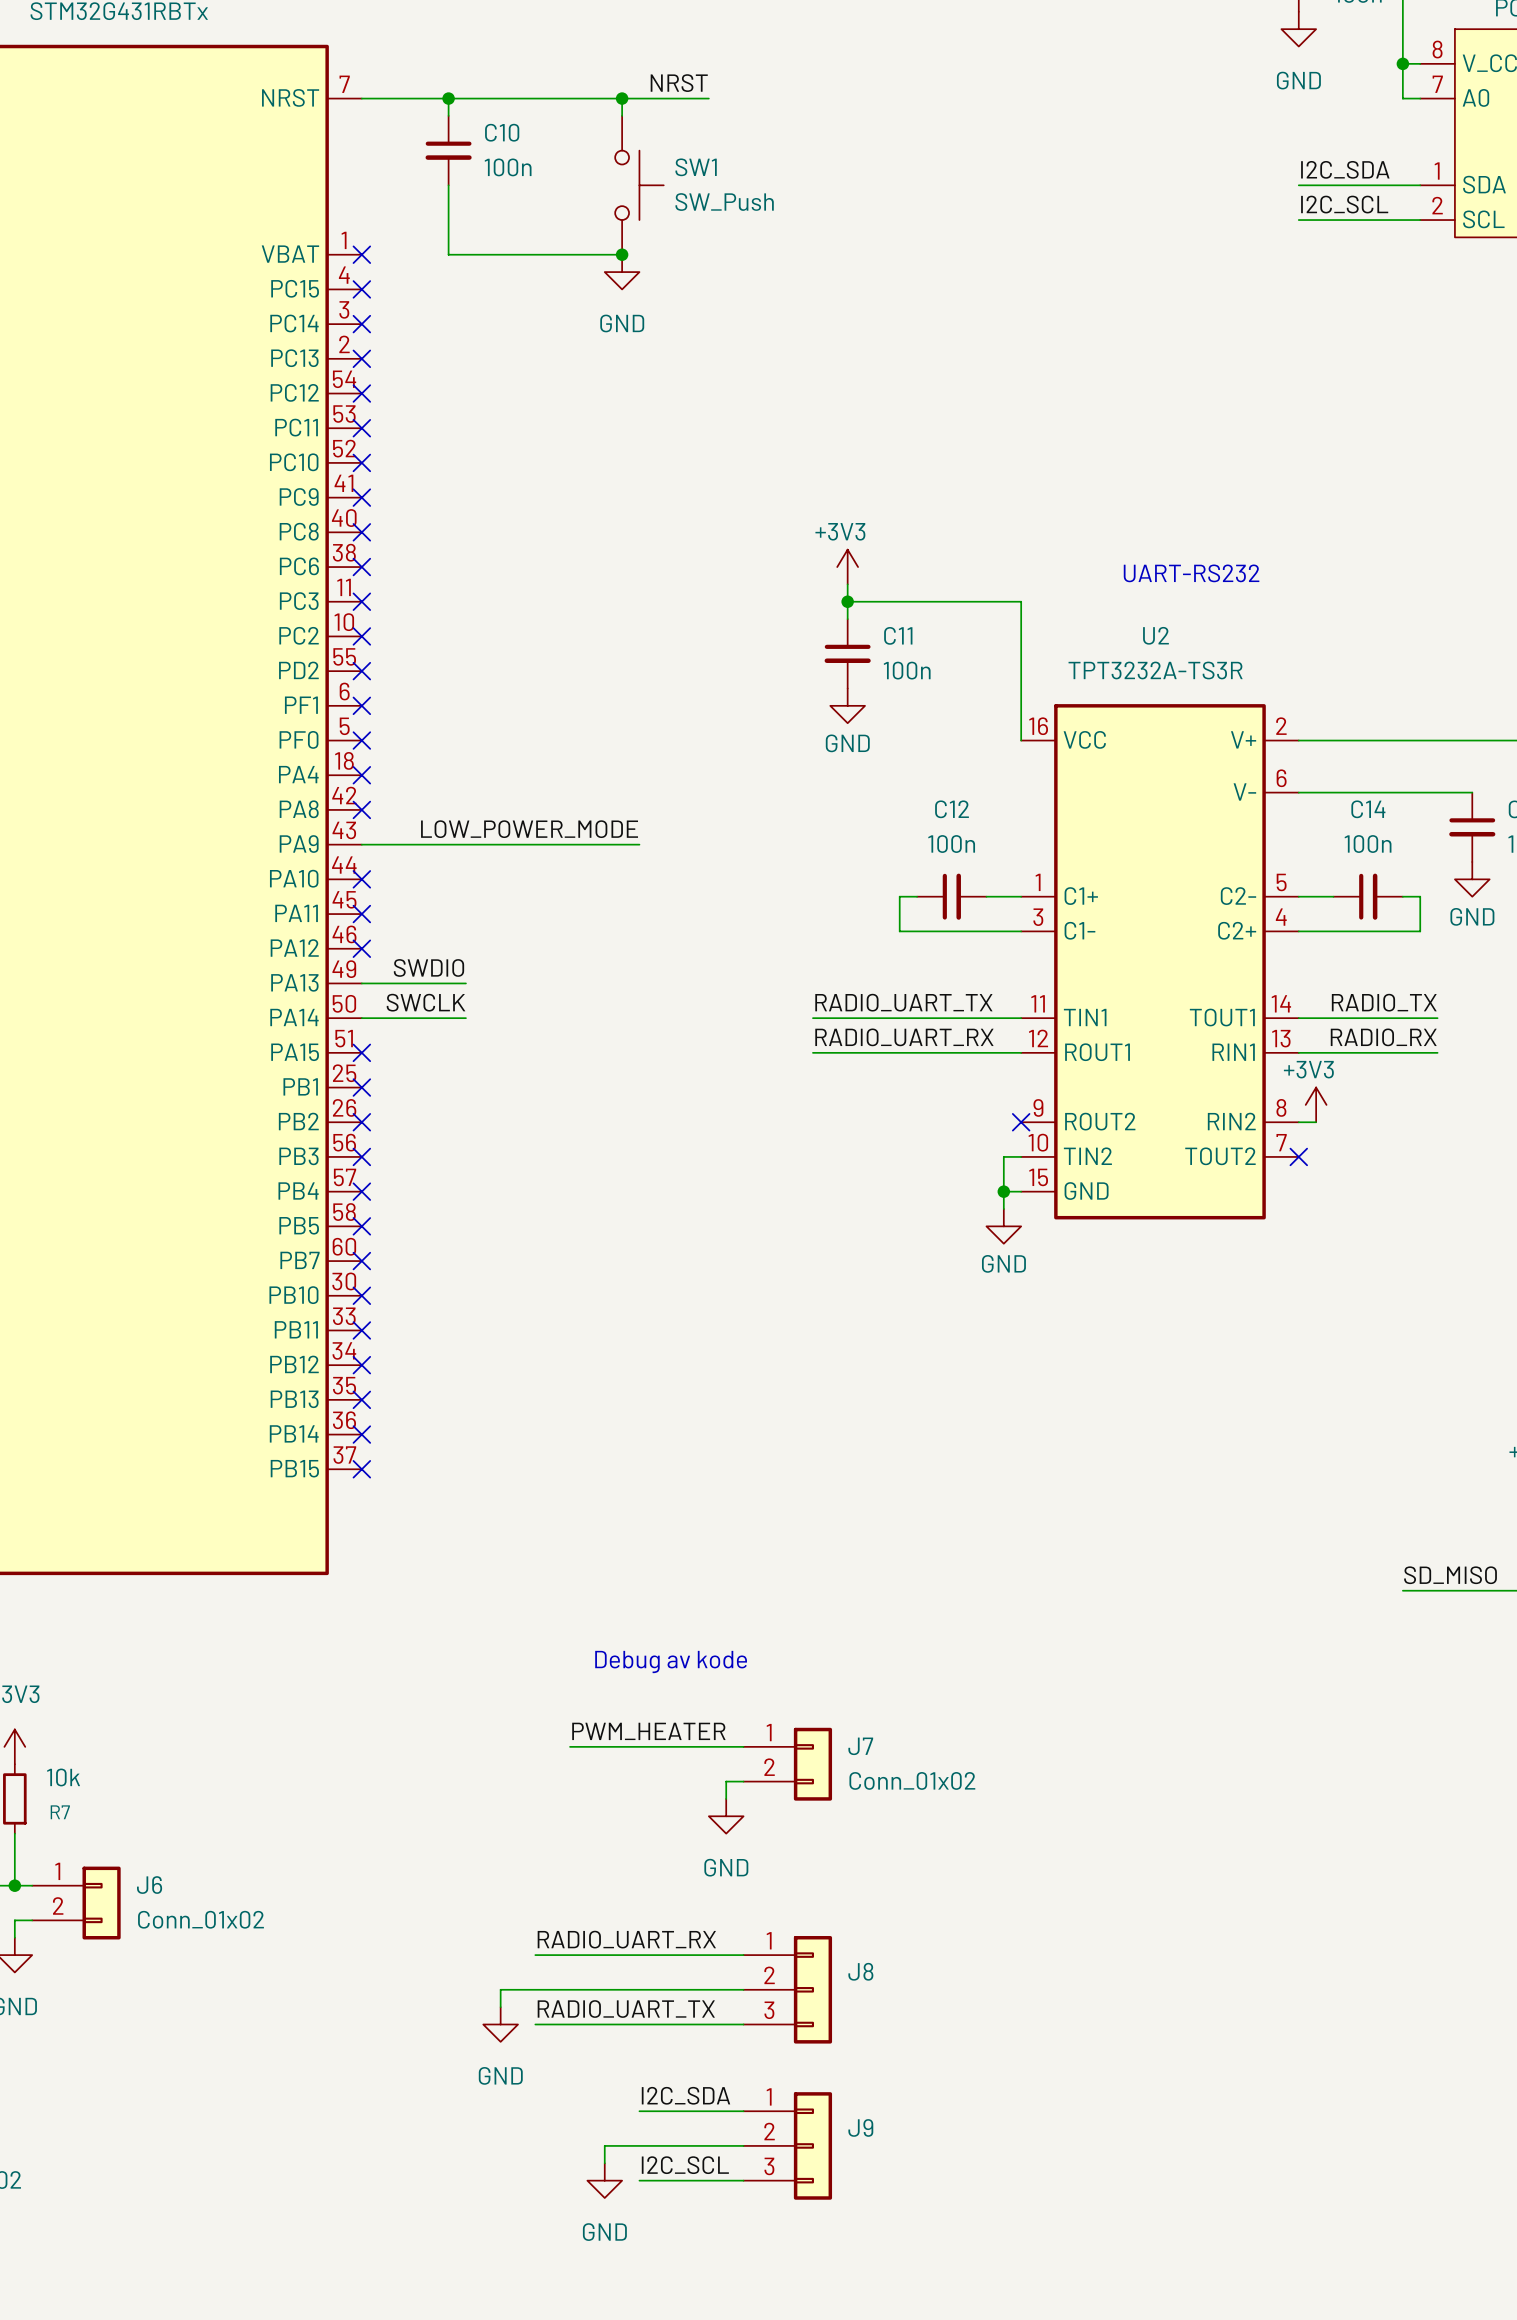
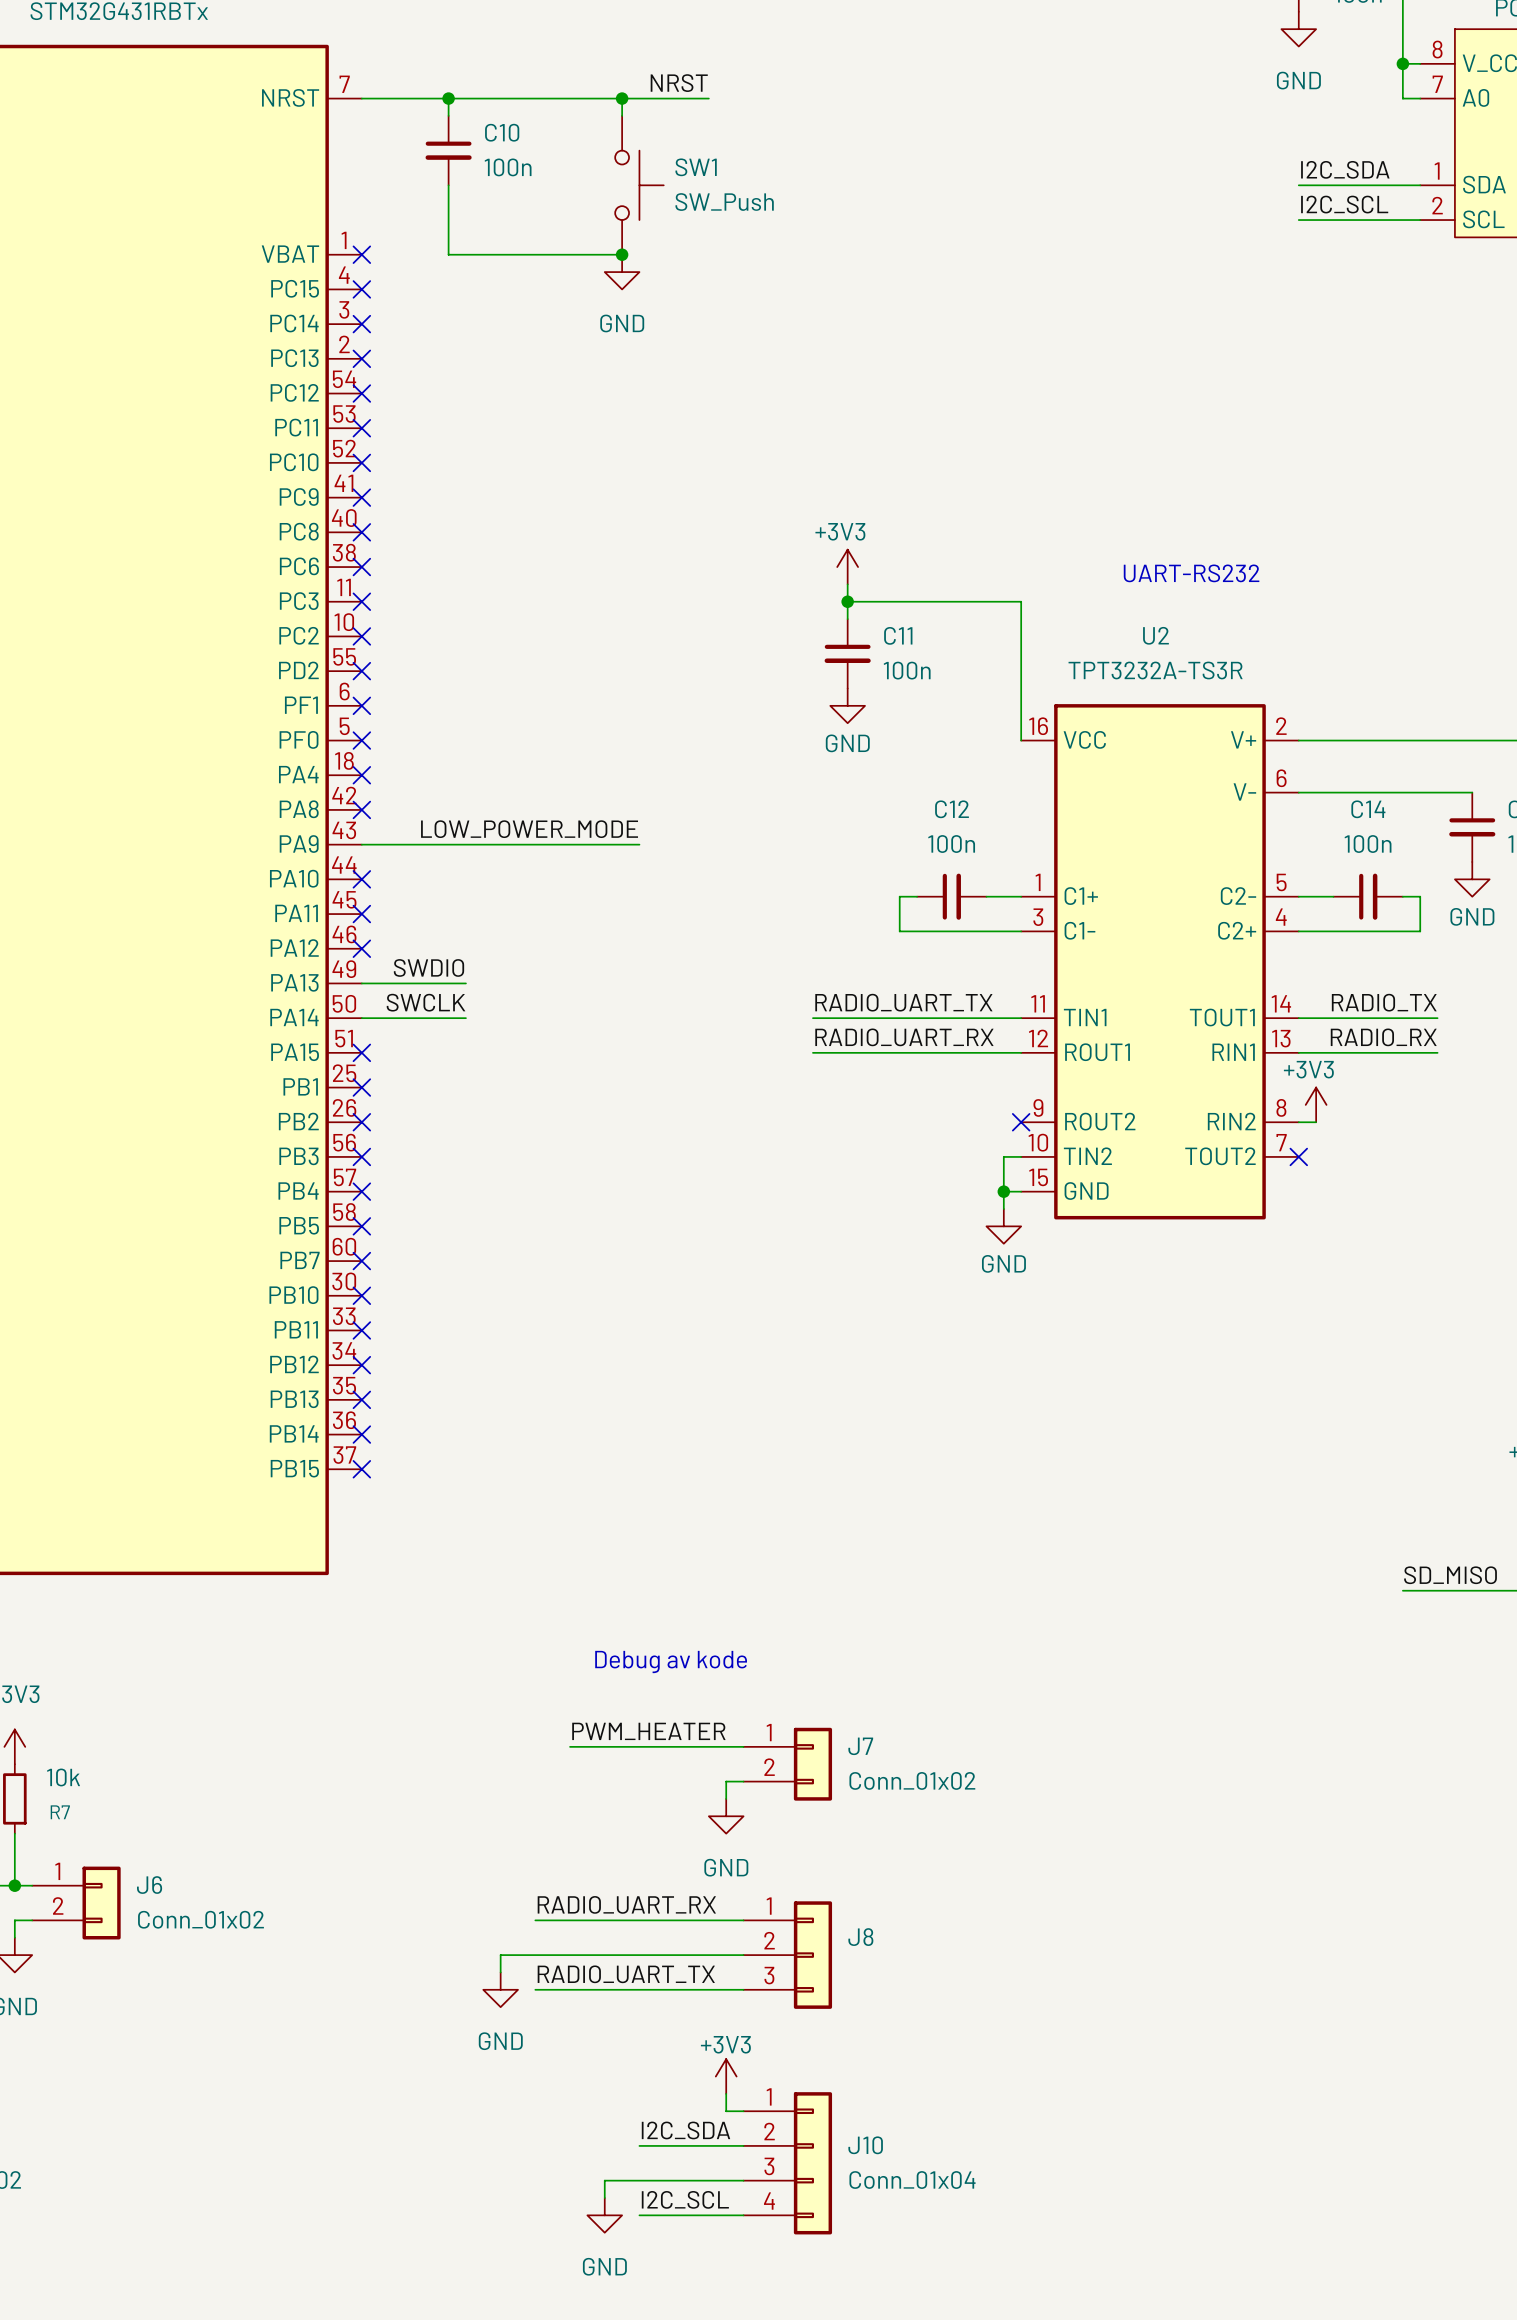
label position: RADIO_UART_RX (626, 1939) -> RADIO_UART_RX (626, 1904)
wire: (535, 1989) (500, 1989) (500, 2007) -> (535, 1955) (500, 1955) (500, 1972)
J8 position: (787, 1989) -> (787, 1955)
label position: RADIO_UART_TX (626, 2009) -> RADIO_UART_TX (626, 1974)
power symbol position: GND (500, 2024) -> GND (500, 1989)
wire: (535, 2024) (743, 2024) -> (535, 1920) (743, 1920)
power symbol: none -> +3V3 (726, 2076)
label position: I2C_SDA (685, 2095) -> I2C_SDA (685, 2130)
wire: (639, 2111) (726, 2111) -> (726, 2093) (726, 2111)
wire: (639, 2145) (604, 2145) (604, 2163) -> (639, 2180) (604, 2180) (604, 2198)
J9: (787, 2145) -> none
J10: none -> Conn_01x04 (787, 2163)
label position: I2C_SCL (685, 2165) -> I2C_SCL (685, 2199)
power symbol position: GND (604, 2180) -> GND (604, 2215)
wire: none -> (639, 2215) (743, 2215)

